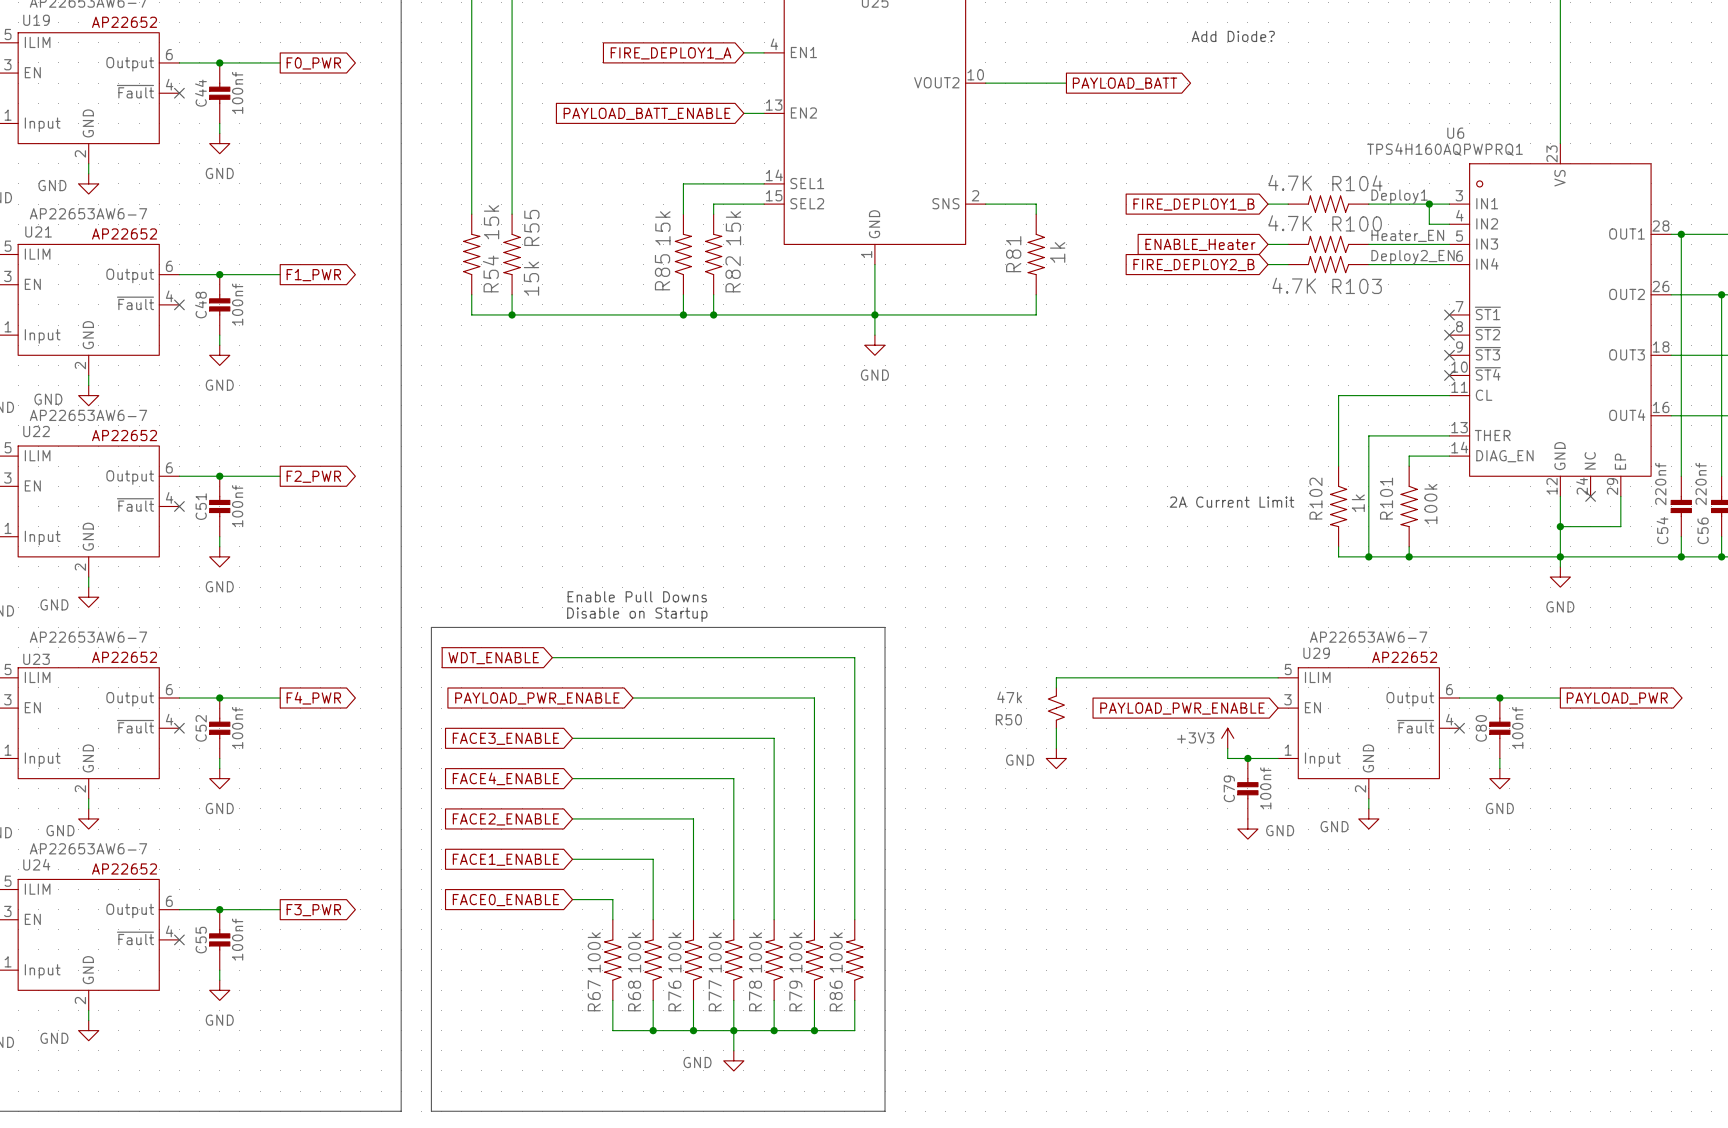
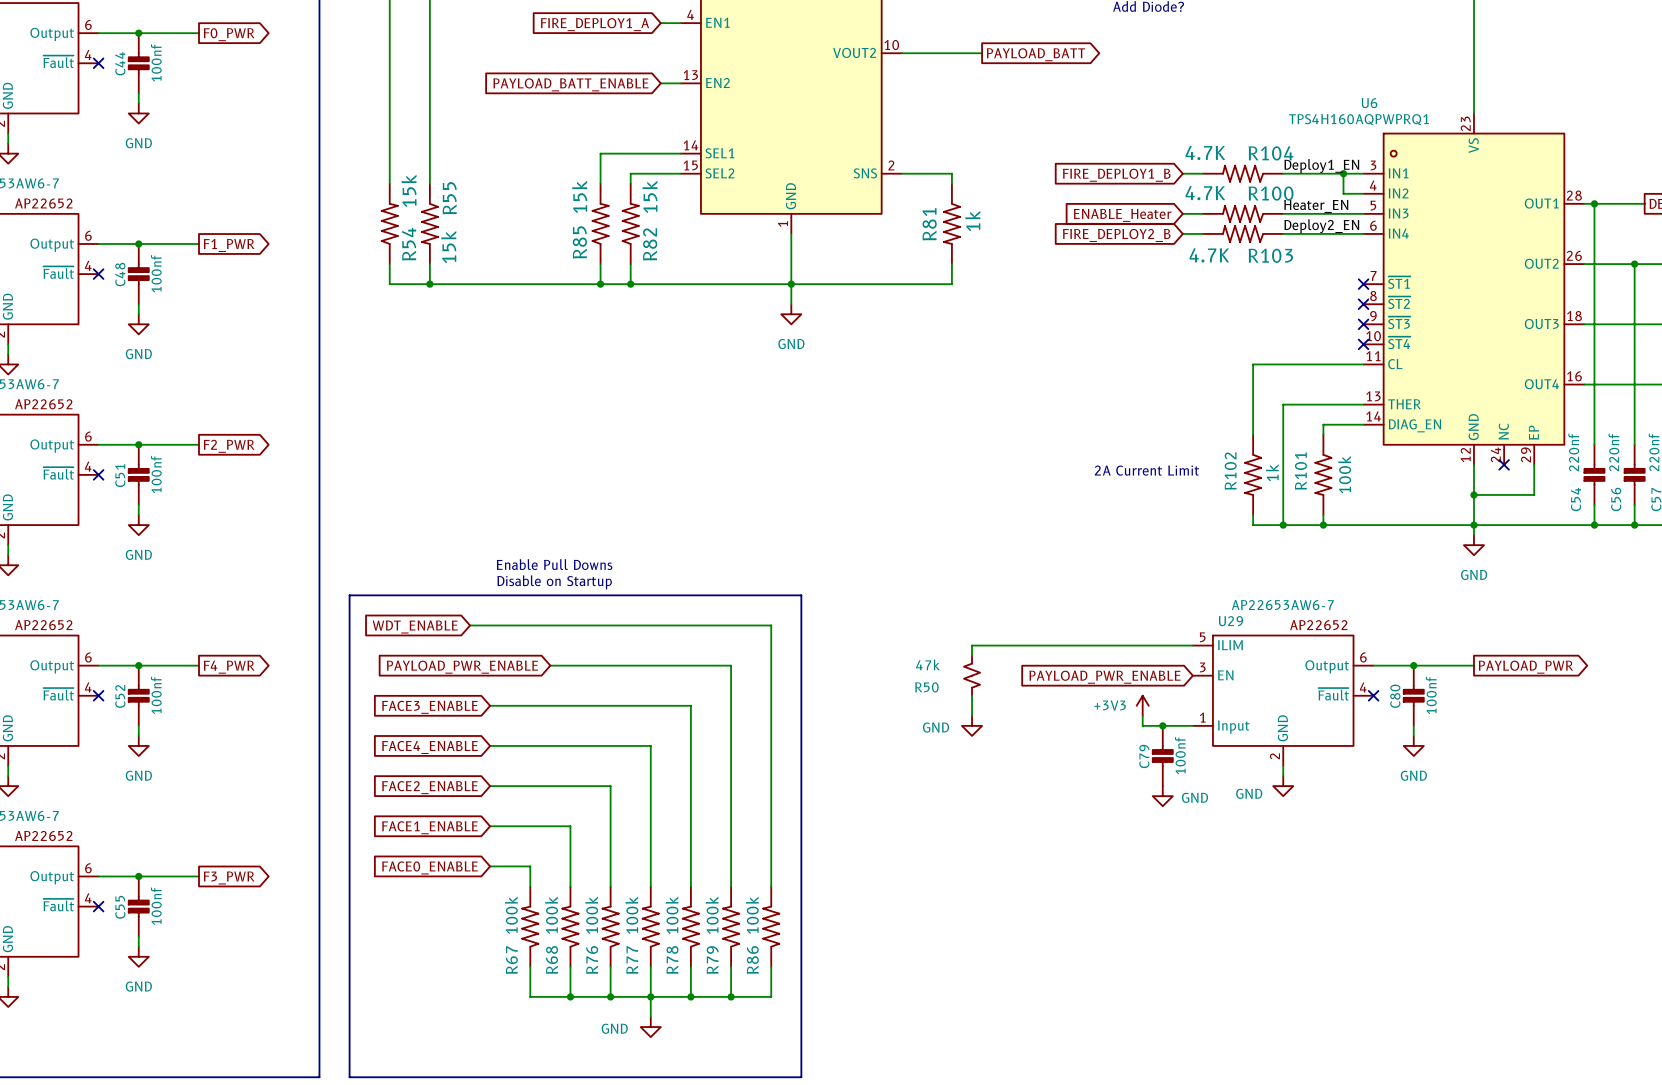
label: Deploy1 (1399, 196) -> Deploy1_EN (1321, 166)

